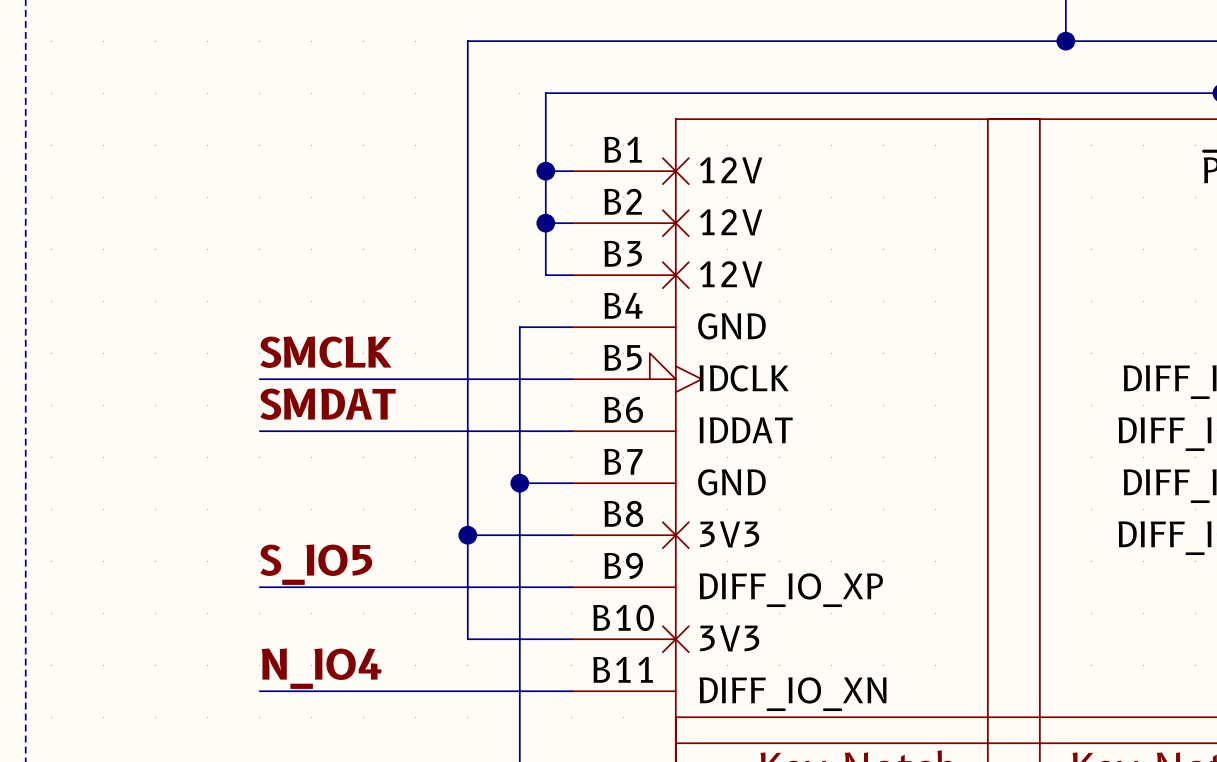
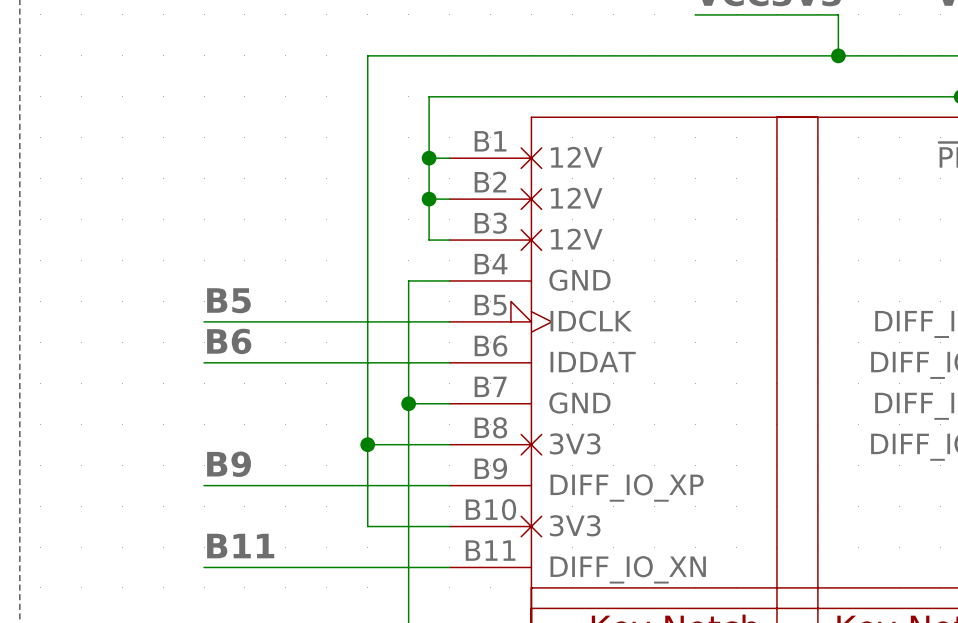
label: SMCLK (326, 352) -> B5 (228, 300)
label: SMDAT (328, 404) -> B6 (229, 341)
label: S_IO5 (316, 564) -> B9 (229, 464)
label: N_IO4 (321, 668) -> B11 (240, 546)

